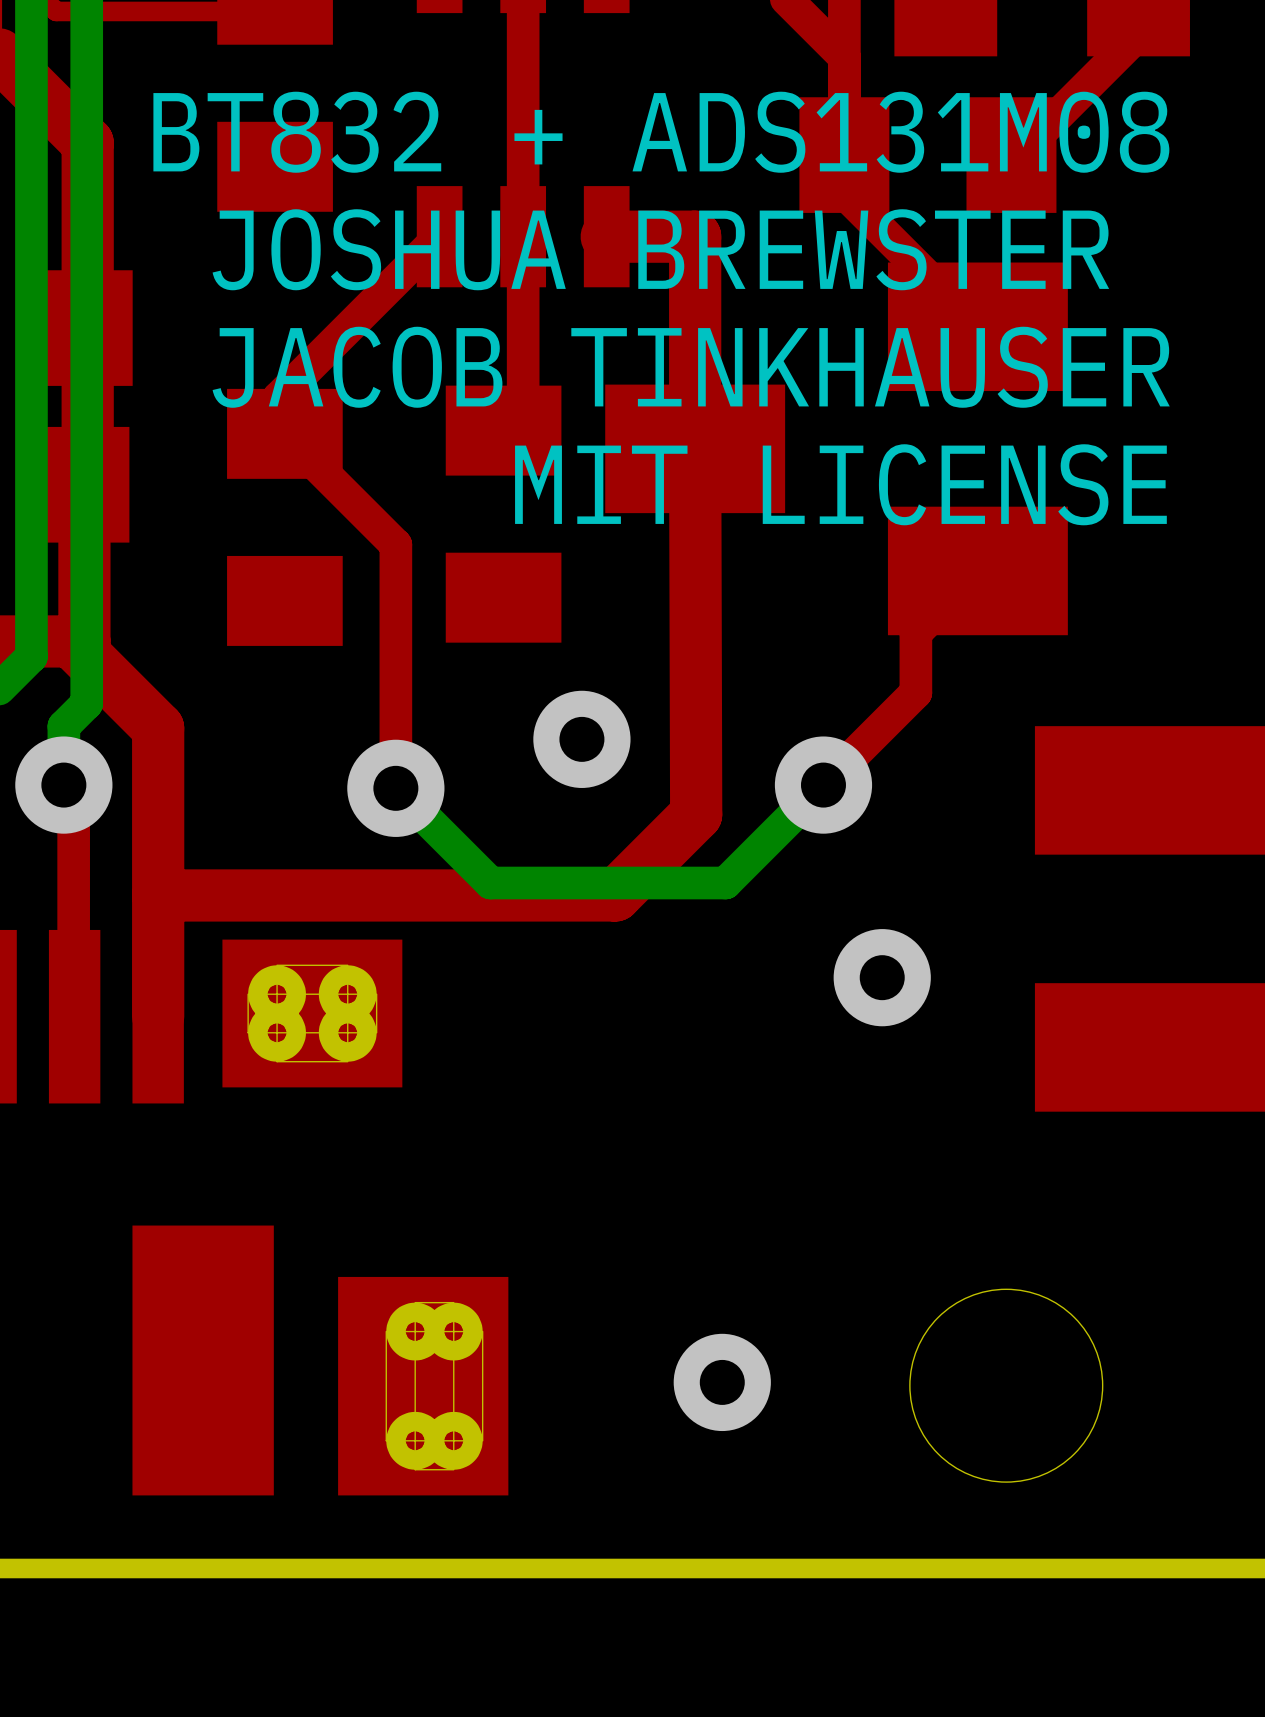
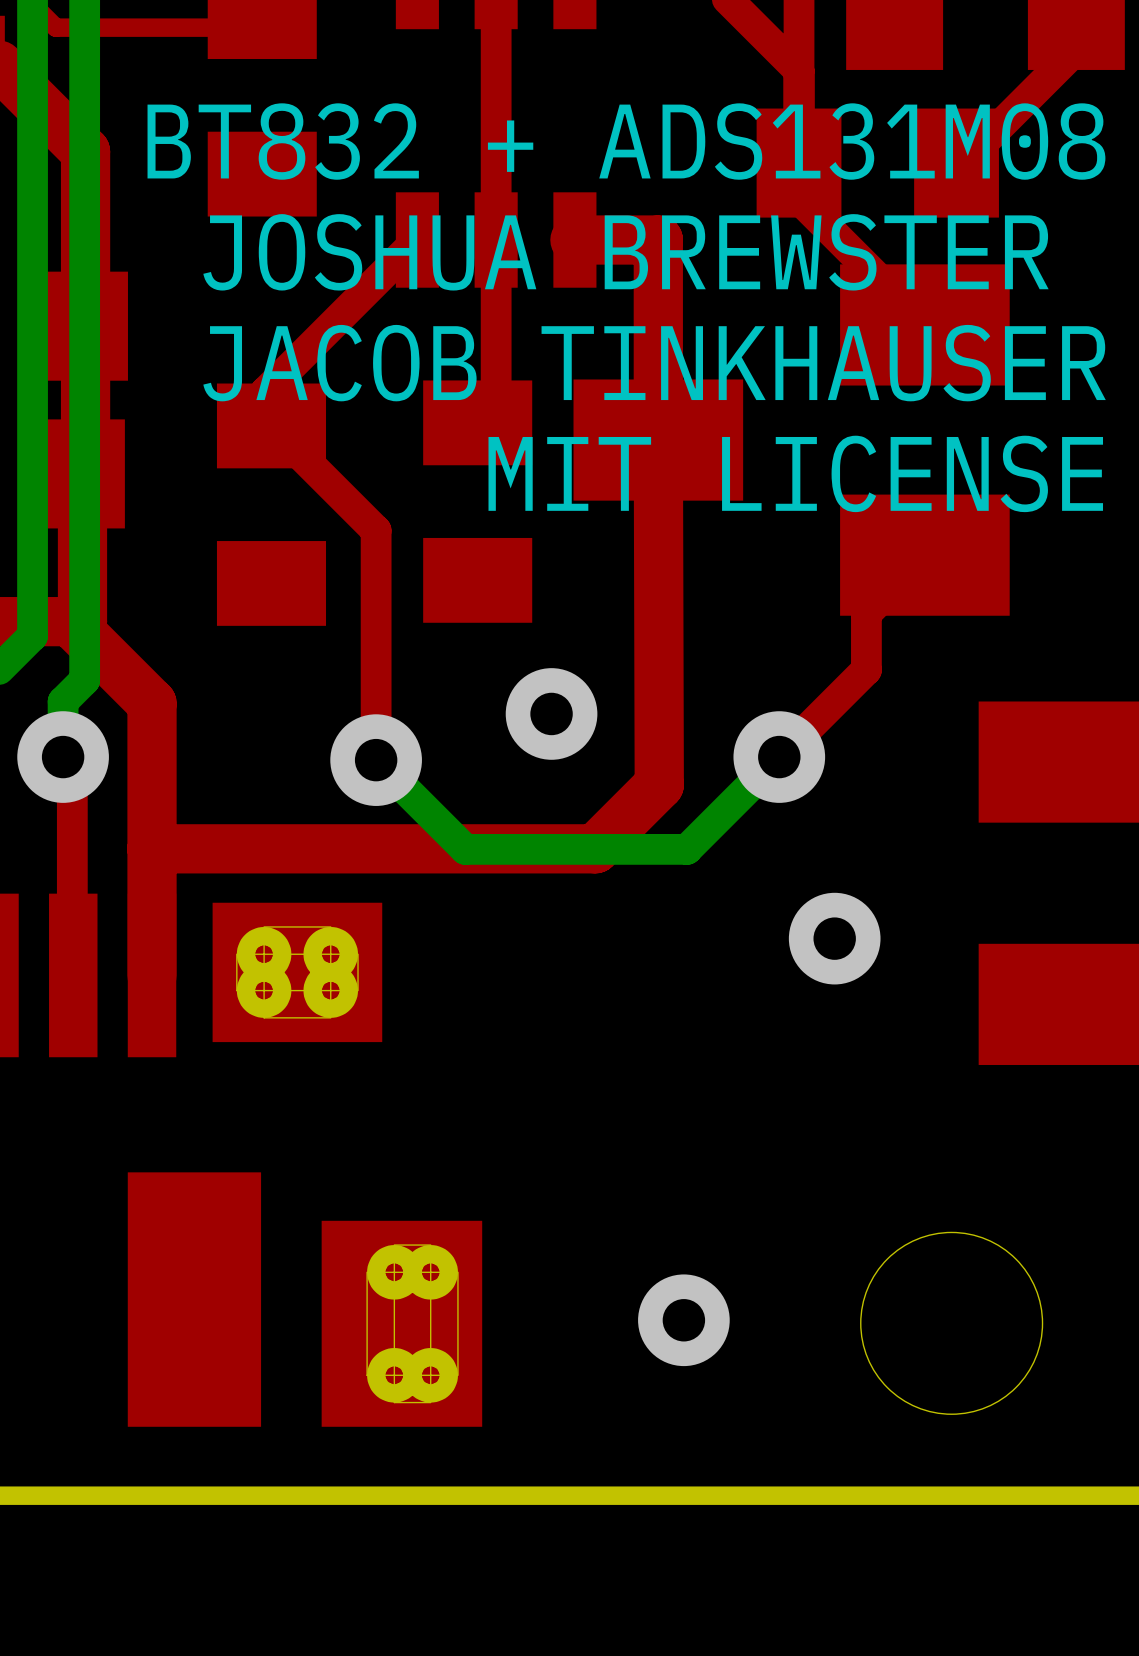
top track: (628, 882) (615, 895) (158, 895) -> (595, 848) (152, 848)

